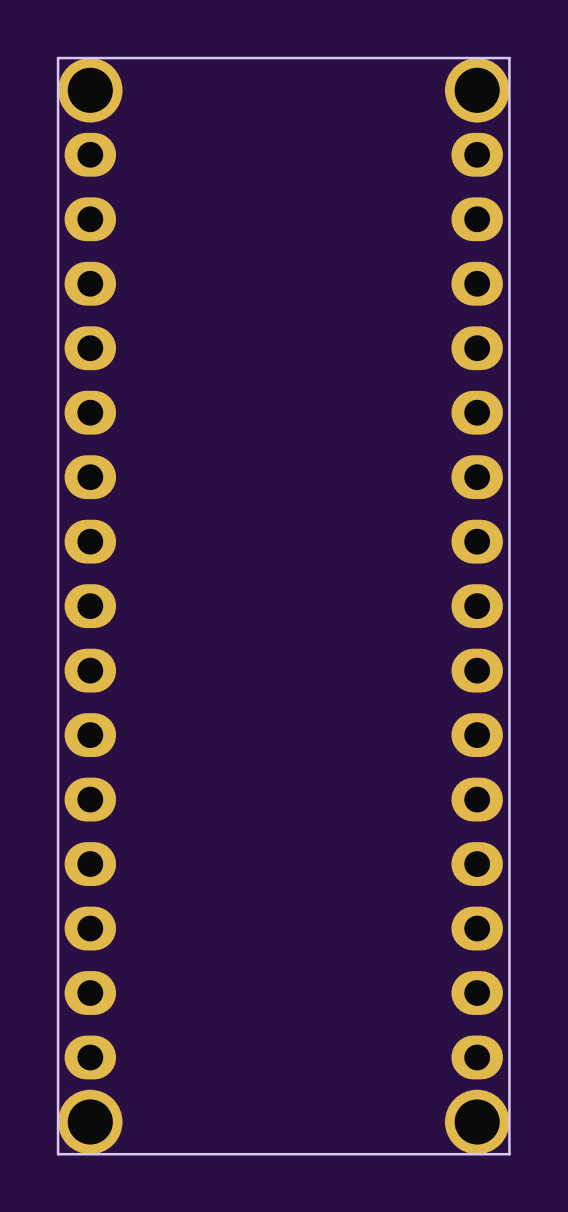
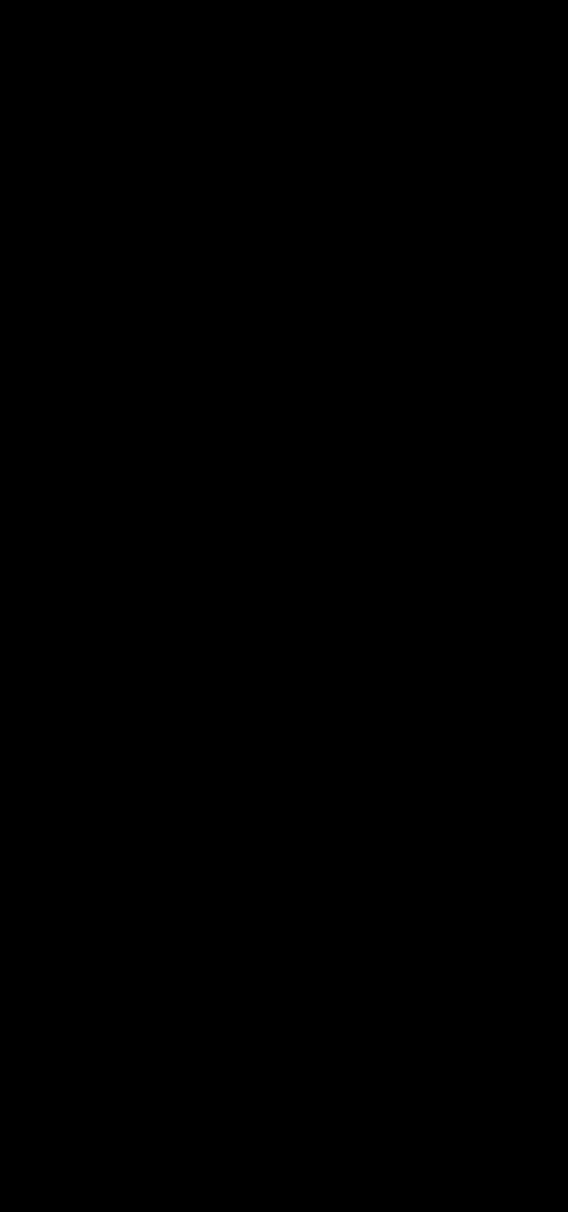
board edge: (509, 58) (509, 1154) (58, 1154) (58, 58) (509, 58) -> none
part: (90, 90) -> none
part: (477, 90) -> none
part: (90, 606) -> none
part: (477, 606) -> none
part: (90, 1121) -> none
part: (477, 1121) -> none

